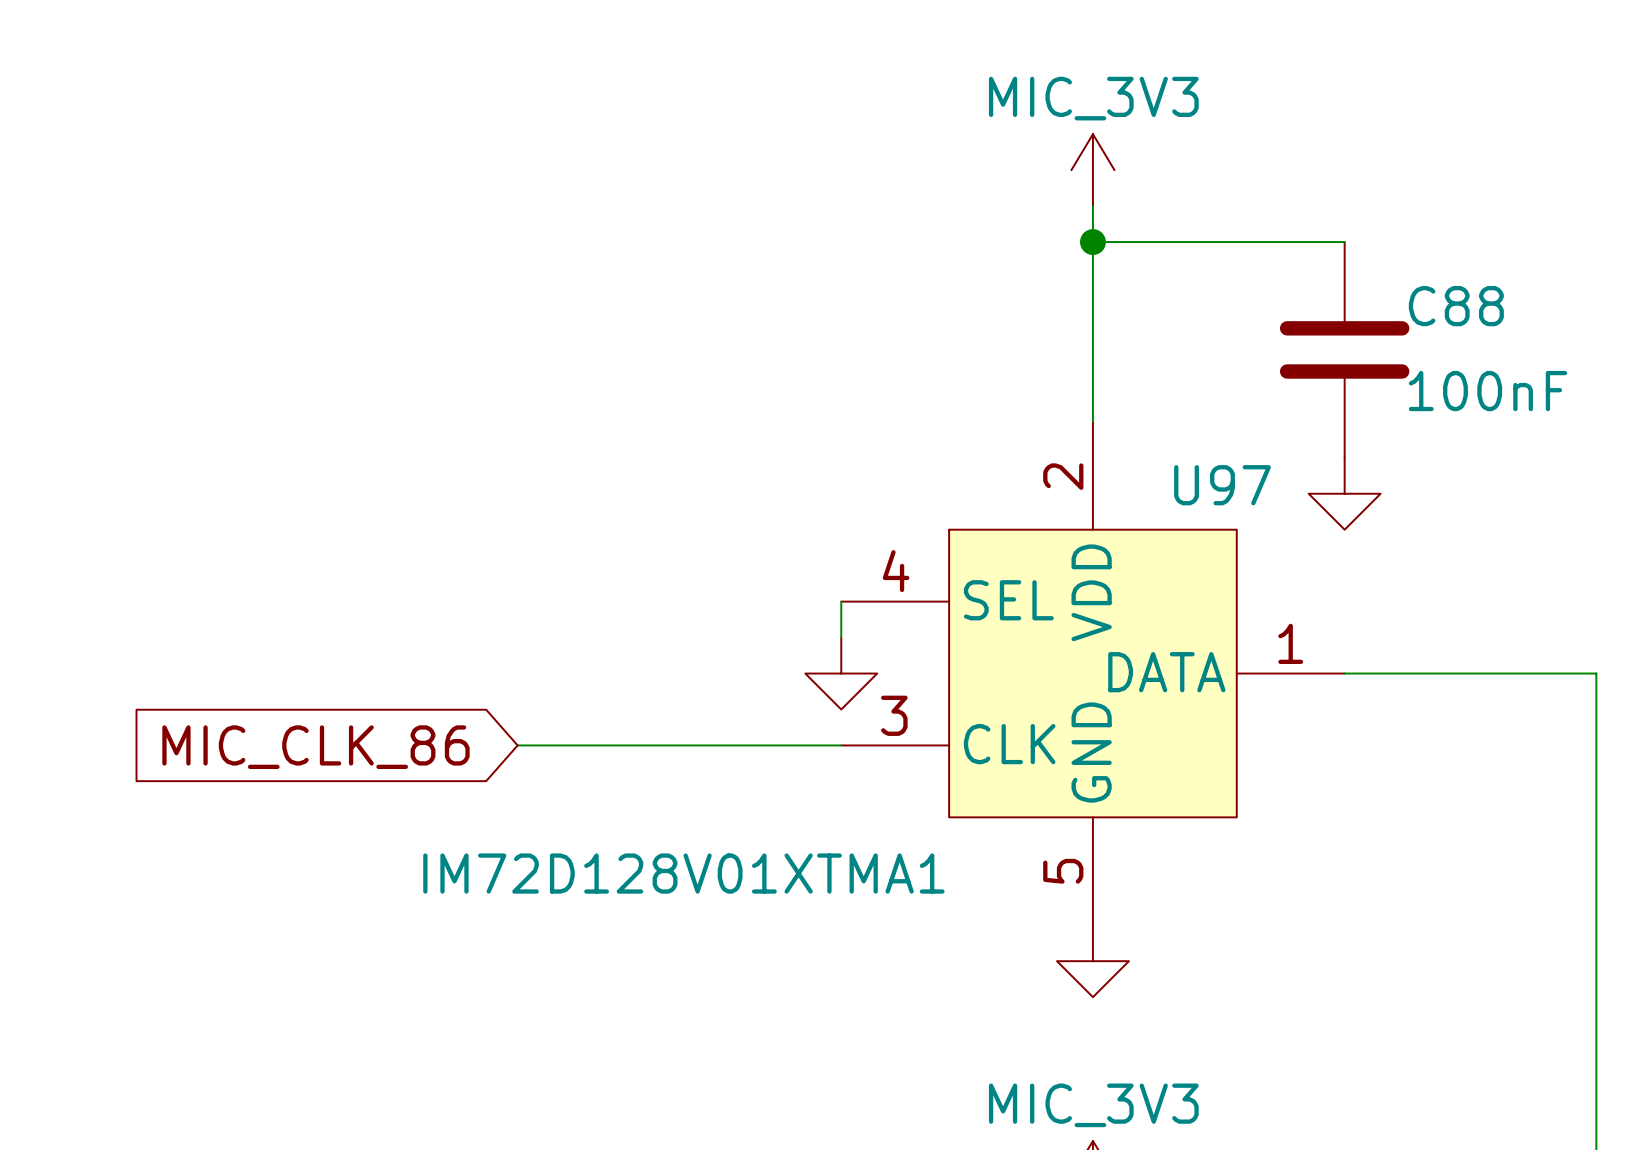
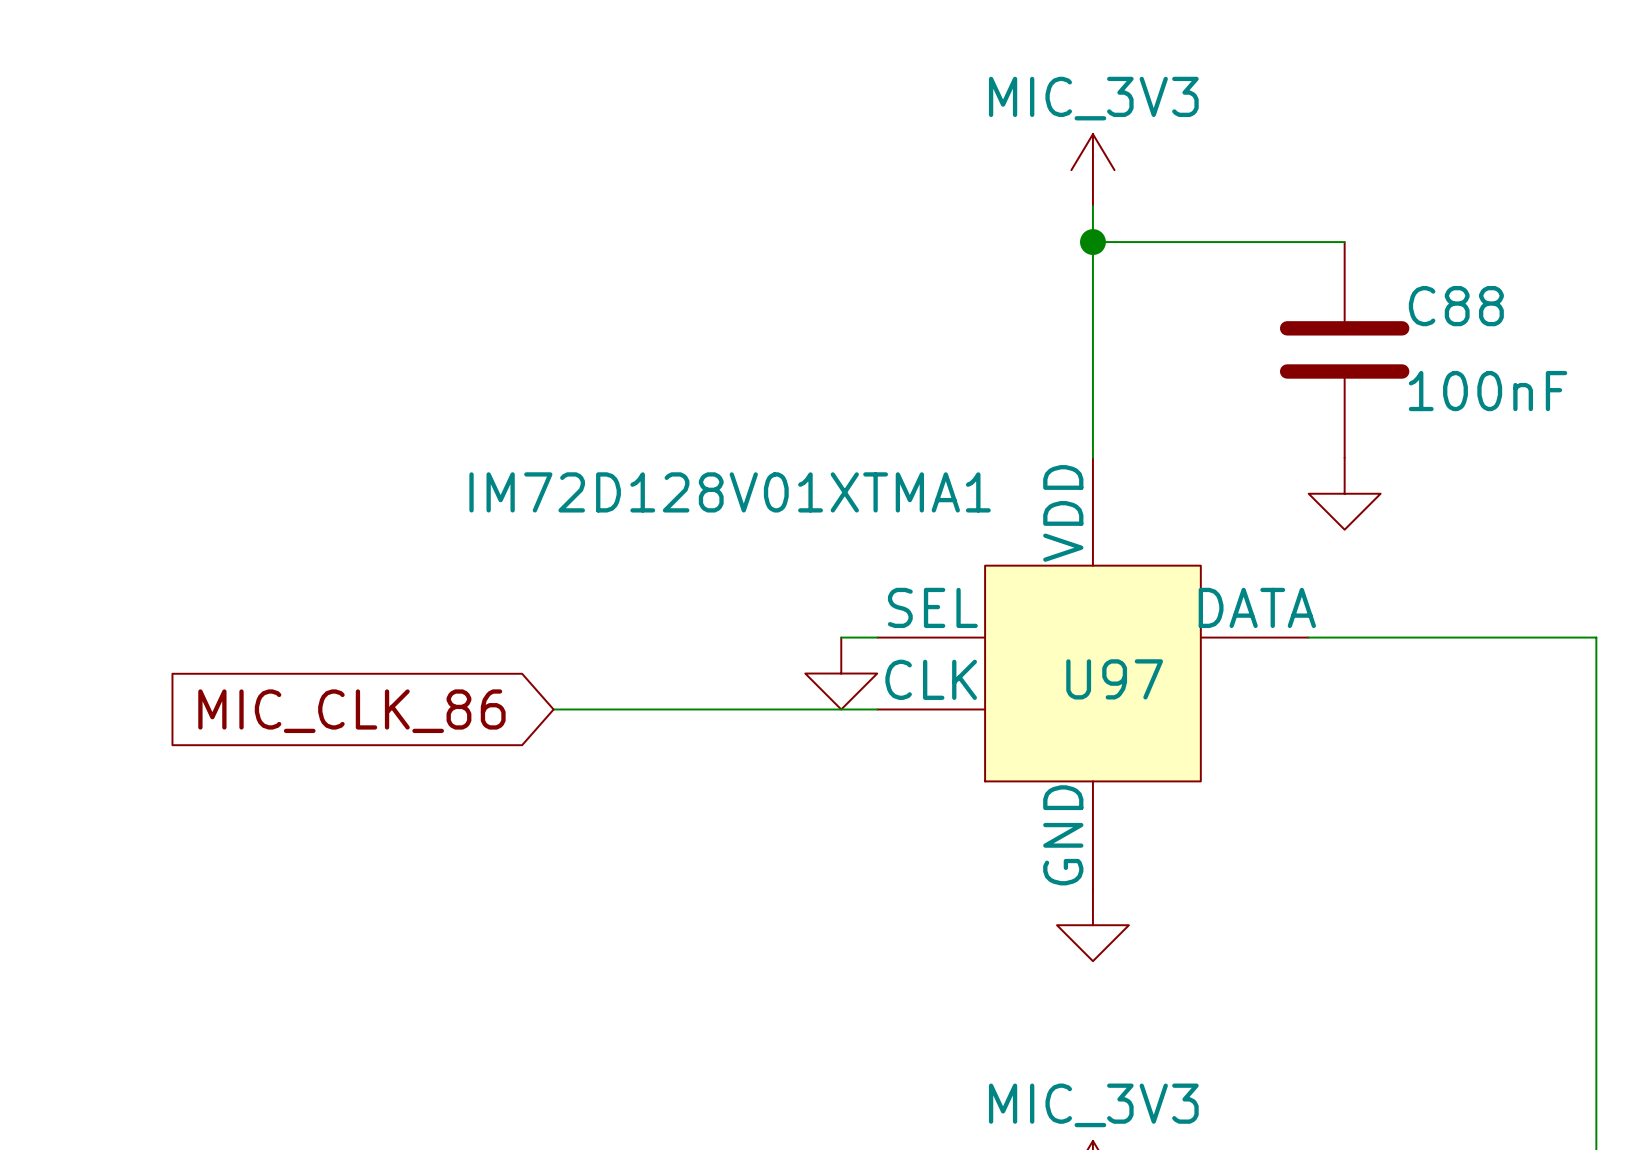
U97 symbol: [841, 421, 1345, 926] -> [877, 457, 1309, 890]
U97 name position: U97 (1222, 485) -> U97 (1114, 679)
wire: (841, 601) (841, 637) -> (877, 637) (841, 637)
wire: (1344, 673) (1596, 673) -> (1308, 637) (1596, 637) (1596, 673)
wire: (517, 745) (841, 745) -> (553, 709) (877, 709)
global label position: MIC_CLK_86 (315, 747) -> MIC_CLK_86 (351, 711)
U97 value position: IM72D128V01XTMA1 (683, 873) -> IM72D128V01XTMA1 (730, 492)
power symbol position: (1092, 961) -> (1092, 925)

